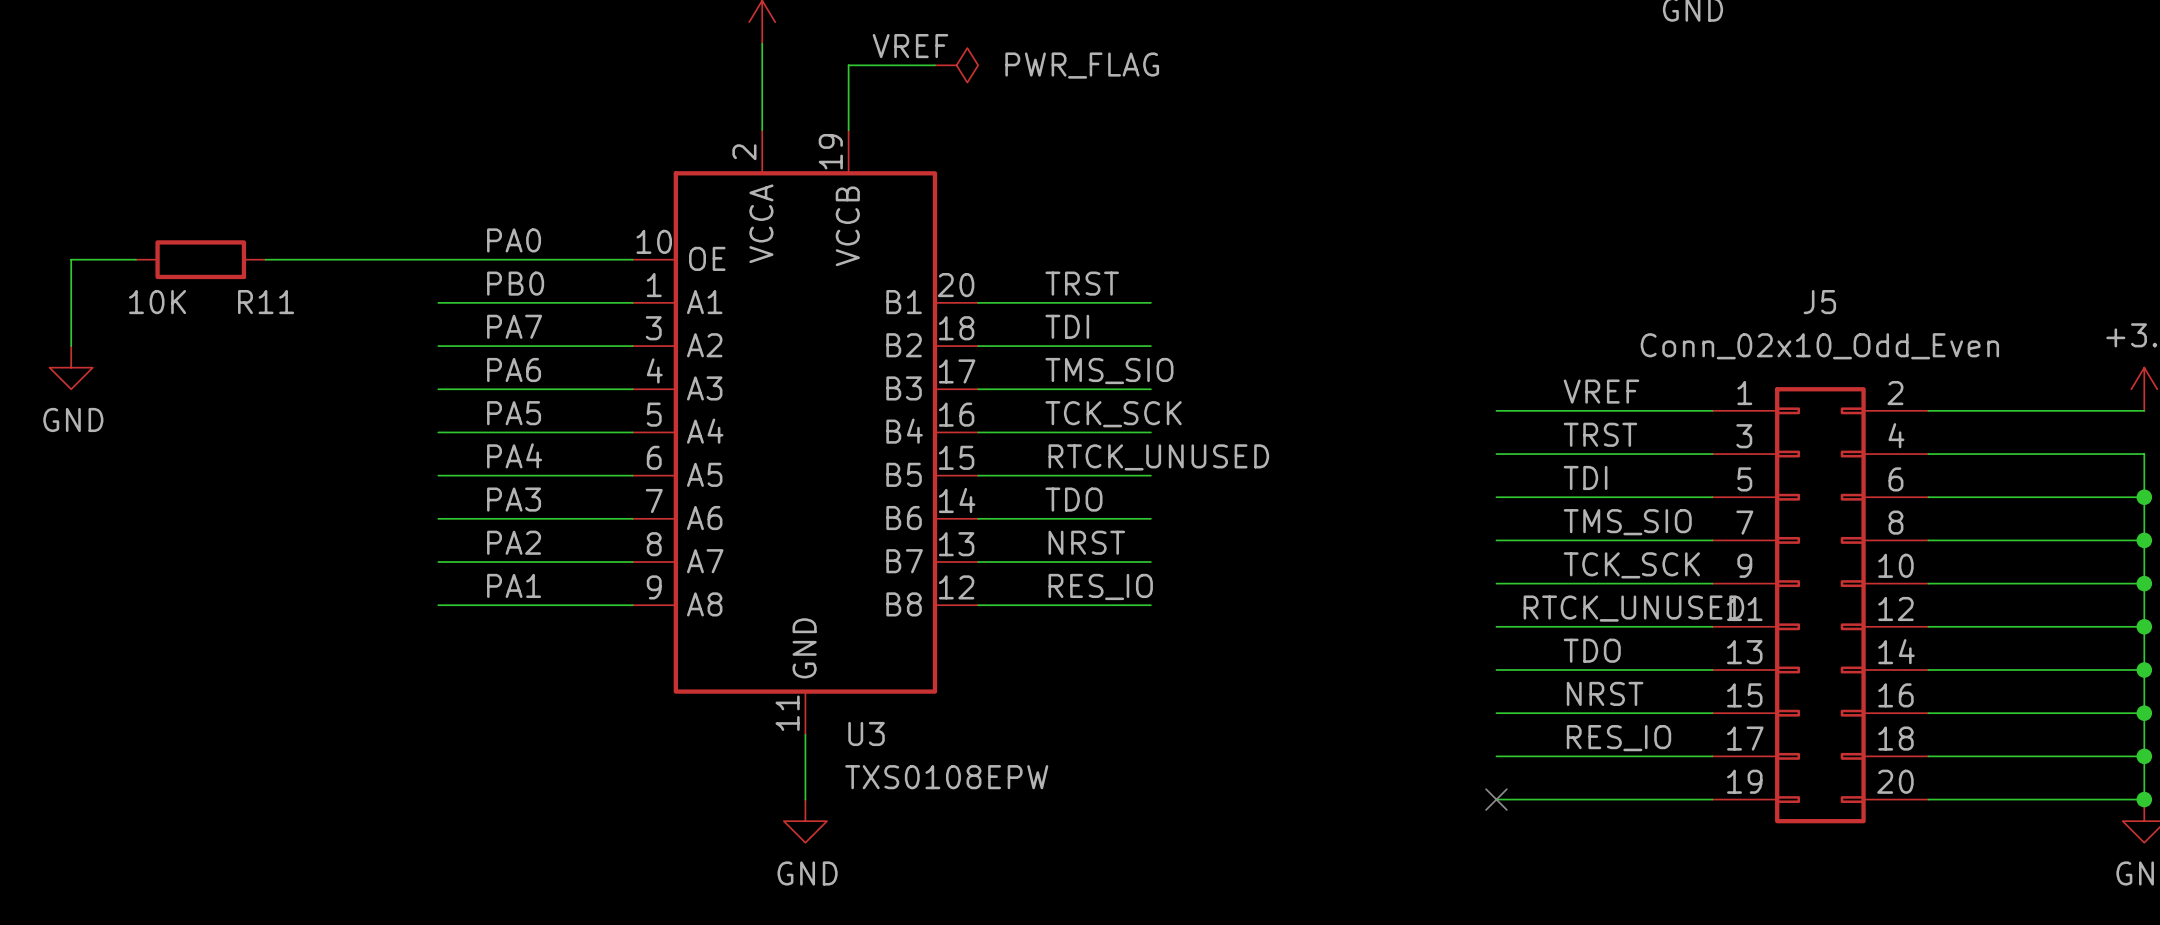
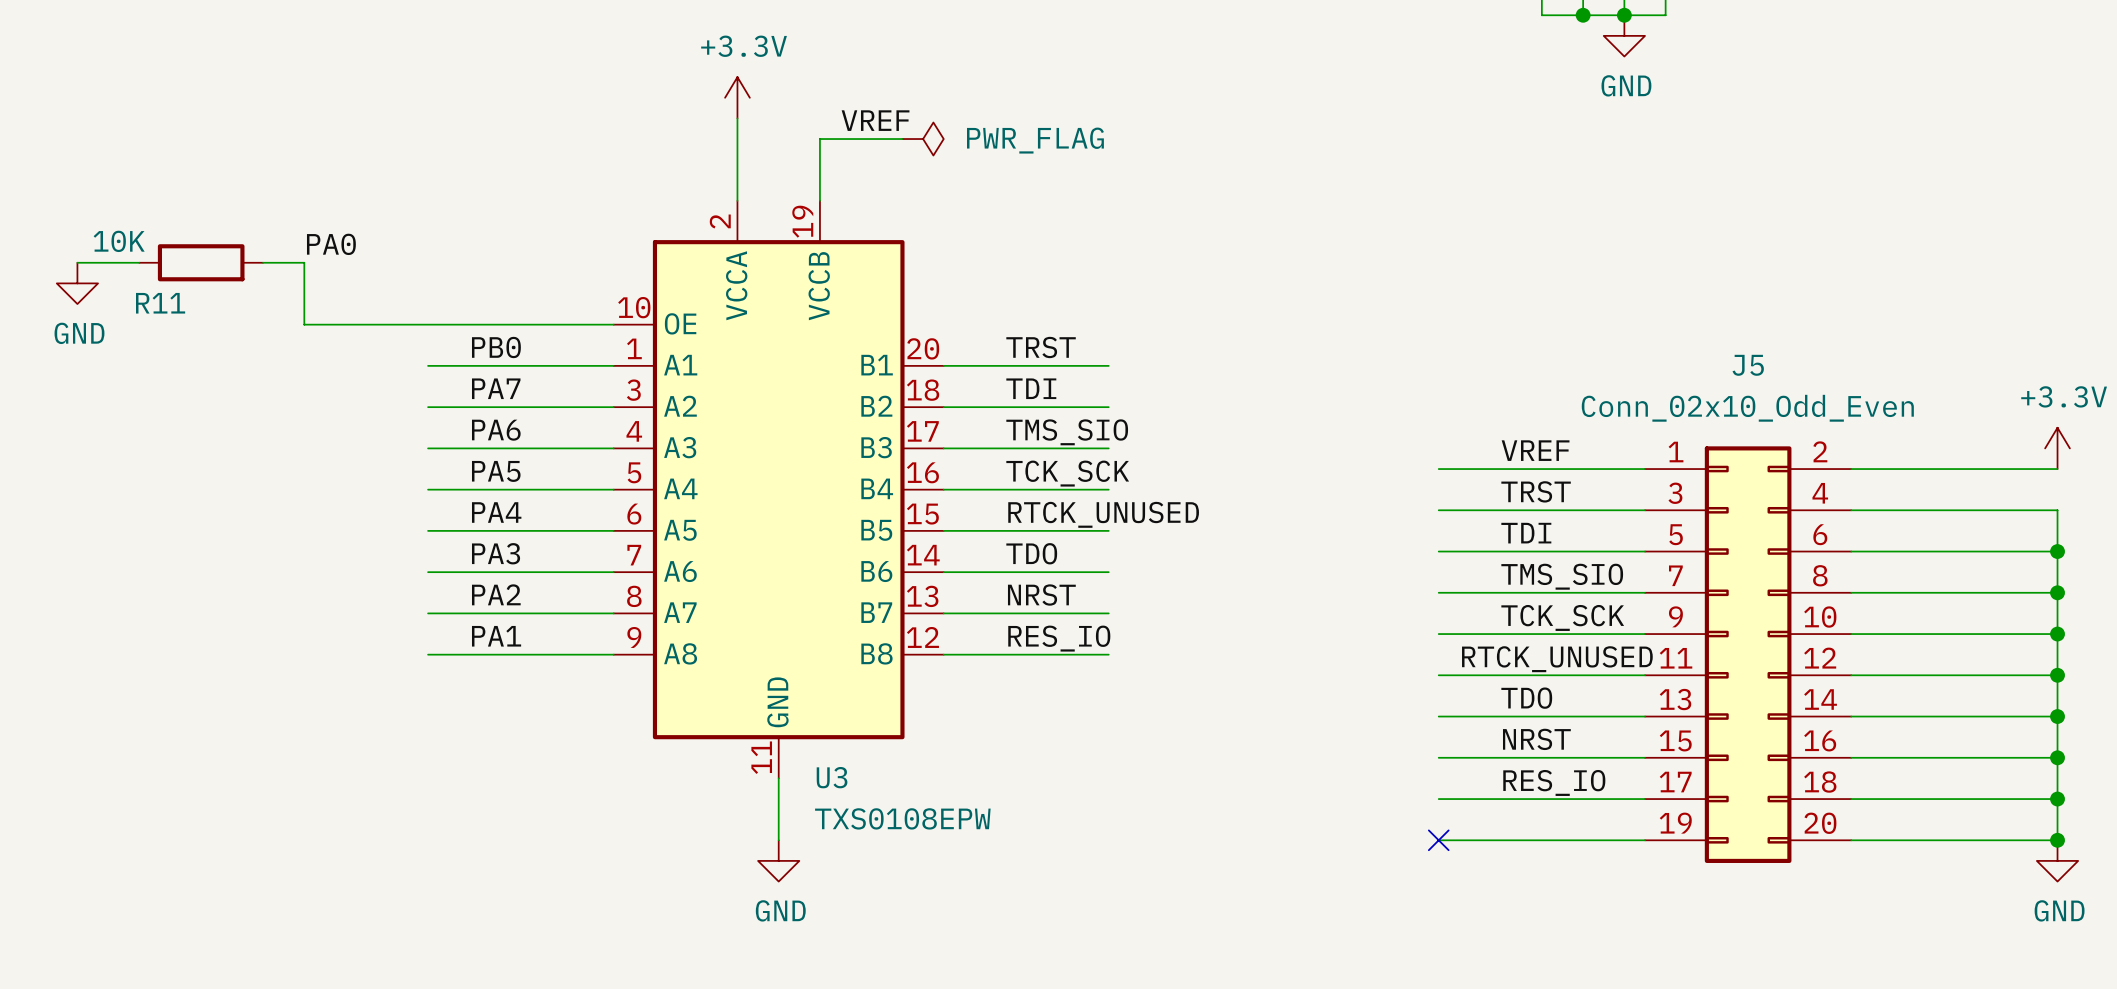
wire: none -> (77, 262) (139, 262)
label position: PA0 (514, 240) -> PA0 (331, 244)
wire: (135, 259) (71, 259) (71, 346) -> none
R11 position: (200, 259) -> (201, 262)
wire: (265, 259) (308, 259) -> (263, 262) (304, 262) (304, 324)
R11 value position: 10K (157, 302) -> 10K (119, 241)
R11 name position: R11 (266, 302) -> R11 (160, 303)
power symbol position: GND (71, 367) -> GND (77, 283)

